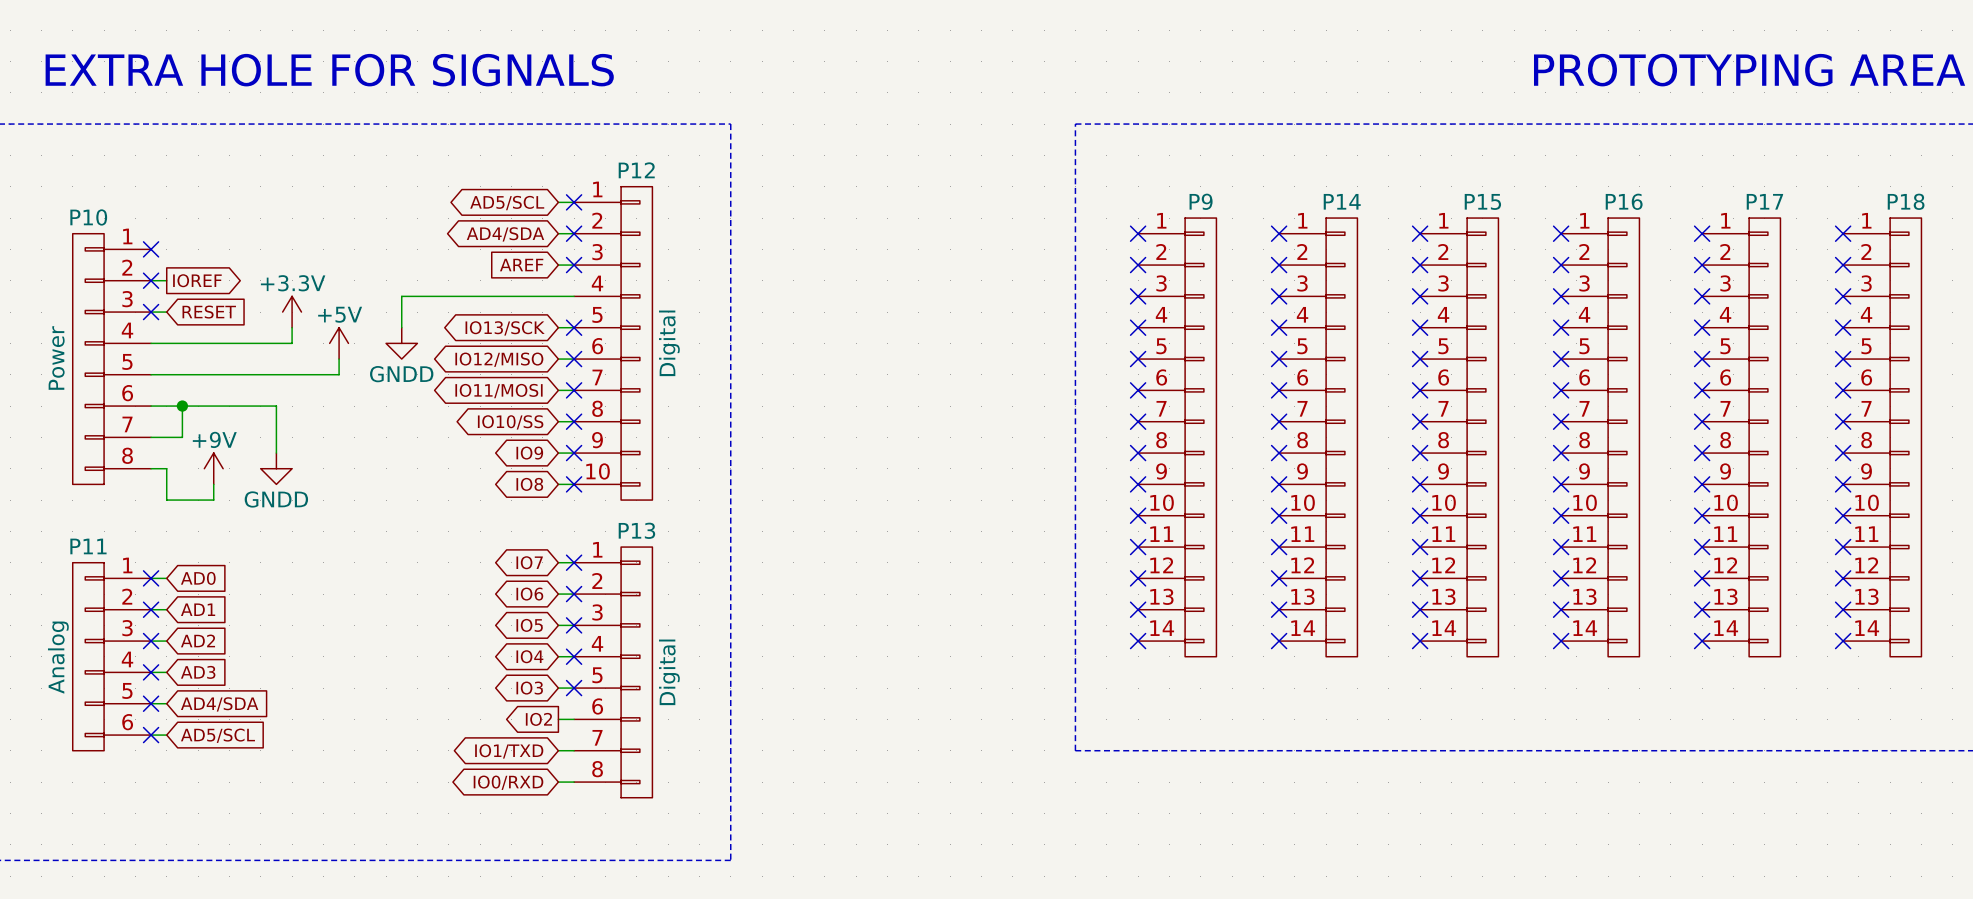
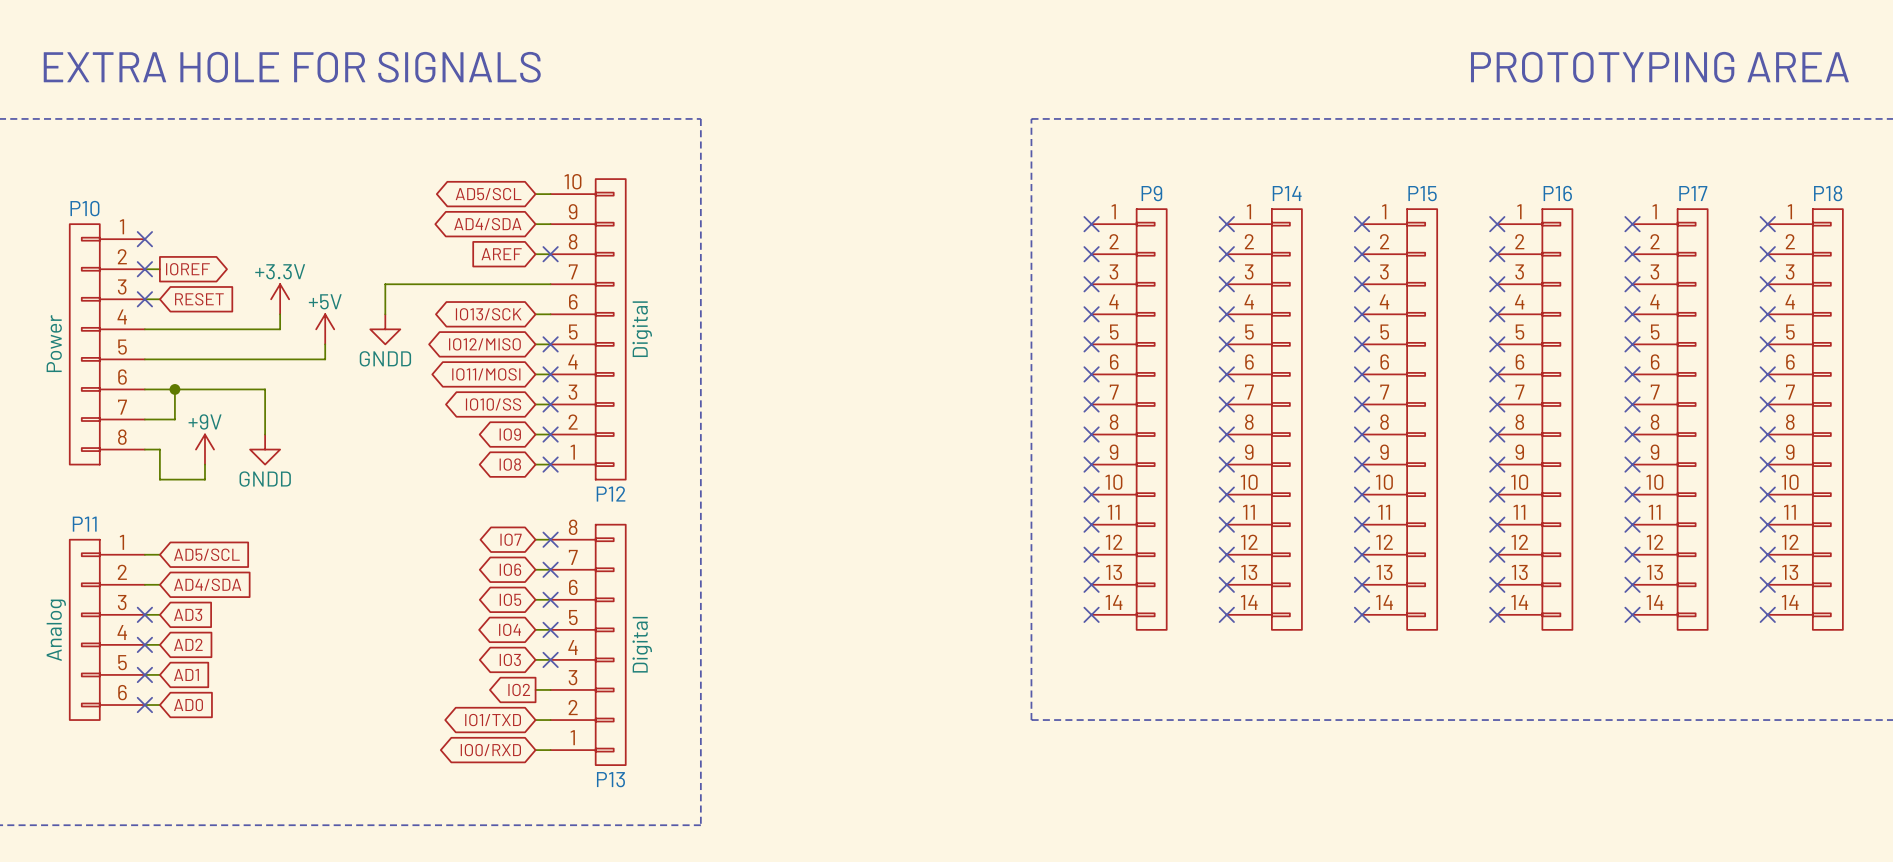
no-connect mark: (574, 202) -> none
no-connect mark: (574, 233) -> none
no-connect mark: (574, 327) -> none
P12 flip: as is (636, 343) -> up-down (610, 329)
no-connect mark: (151, 578) -> none
global label: AD0 (198, 578) -> AD5/SCL (206, 554)
no-connect mark: (151, 609) -> none
global label: AD1 (198, 609) -> AD4/SDA (207, 584)
global label: AD2 (198, 640) -> AD3 (188, 614)
global label: AD3 (198, 672) -> AD2 (188, 644)
P13 flip: as is (636, 672) -> up-down (610, 644)
global label: AD4/SDA (219, 704) -> AD1 (186, 674)
global label: AD5/SCL (217, 735) -> AD0 (188, 705)

